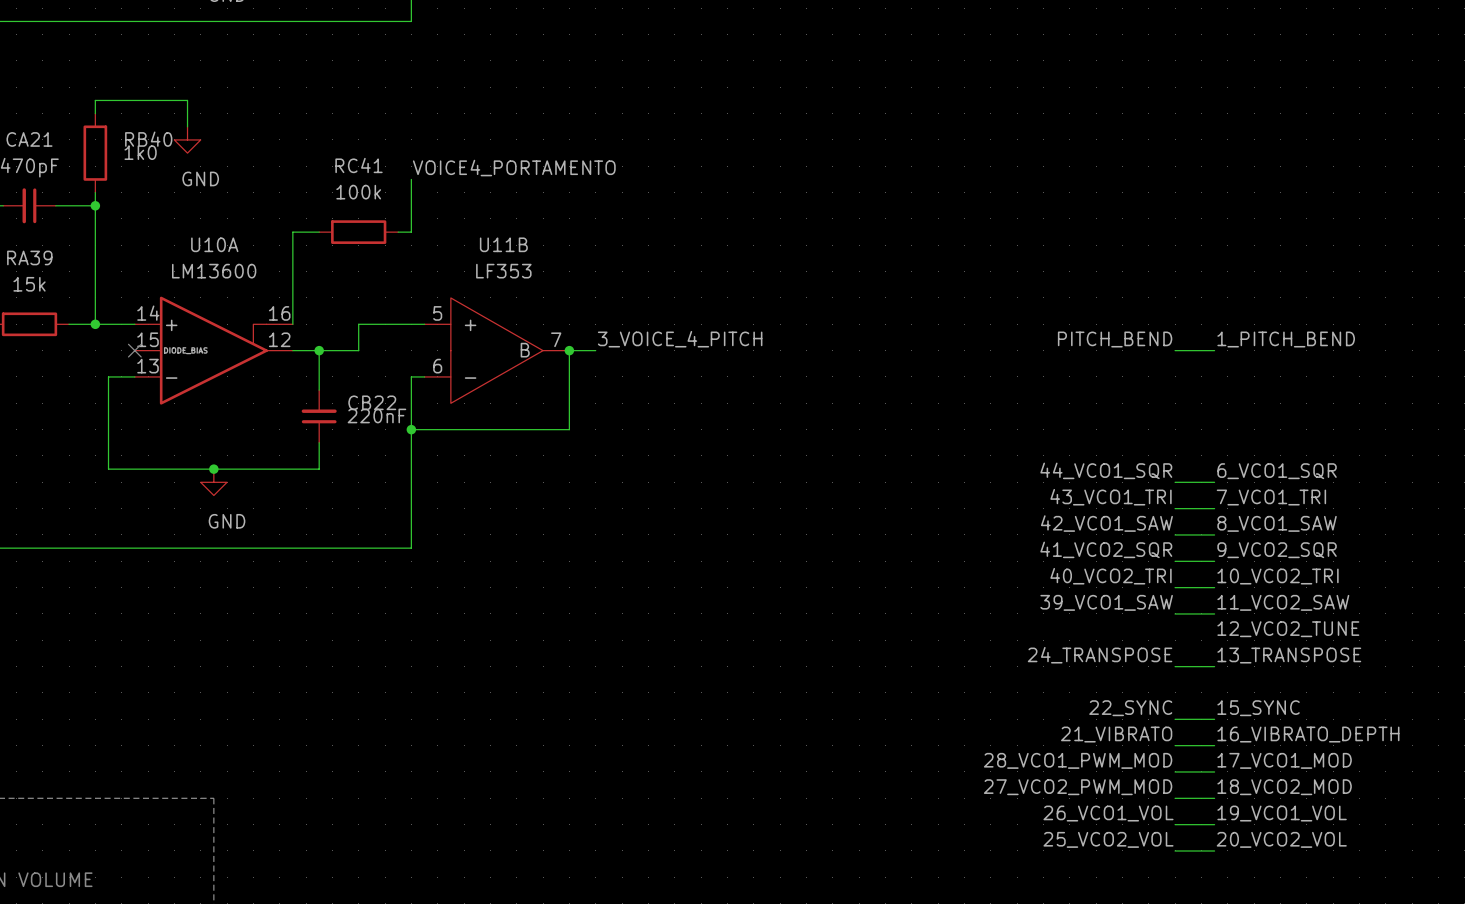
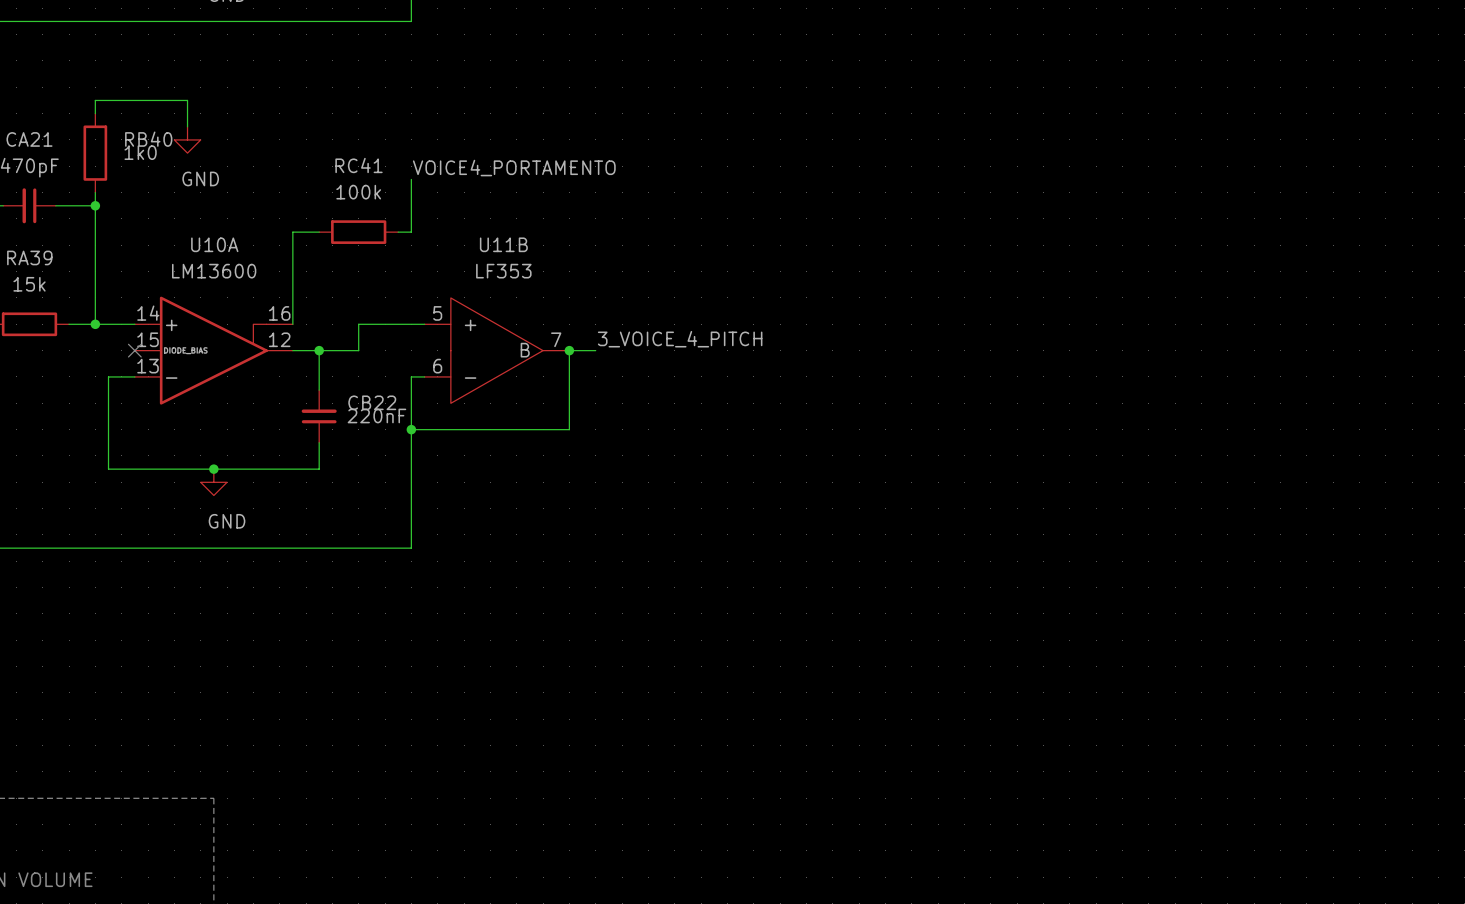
label: PITCH_BEND (1115, 339) -> none
label: 1_PITCH_BEND (1286, 339) -> none
wire: (1175, 350) (1214, 350) -> none
label: 44_VCO1_SQR (1106, 470) -> none
label: 6_VCO1_SQR (1277, 471) -> none
wire: (1175, 482) (1214, 482) -> none
label: 43_VCO1_TRI (1111, 497) -> none
label: 7_VCO1_TRI (1271, 497) -> none
wire: (1175, 508) (1214, 508) -> none
label: 42_VCO1_SAW (1106, 523) -> none
label: 8_VCO1_SAW (1277, 523) -> none
wire: (1175, 534) (1214, 534) -> none
label: 41_VCO2_SQR (1106, 549) -> none
label: 9_VCO2_SQR (1277, 550) -> none
wire: (1175, 561) (1214, 561) -> none
label: 40_VCO2_TRI (1111, 576) -> none
label: 10_VCO2_TRI (1278, 576) -> none
wire: (1175, 587) (1214, 587) -> none
label: 39_VCO1_SAW (1106, 602) -> none
label: 11_VCO2_SAW (1283, 602) -> none
wire: (1175, 613) (1214, 613) -> none
label: 12_VCO2_TUNE (1288, 629) -> none
label: 24_TRANSPOSE (1100, 655) -> none
label: 13_TRANSPOSE (1289, 655) -> none
wire: (1175, 666) (1214, 666) -> none
label: 22_SYNC (1130, 708) -> none
label: 15_SYNC (1258, 708) -> none
wire: (1175, 719) (1214, 719) -> none
label: 21_VIBRATO (1116, 734) -> none
label: 16_VIBRATO_DEPTH (1308, 734) -> none
wire: (1175, 745) (1214, 745) -> none
label: 28_VCO1_PWM_MOD (1078, 760) -> none
label: 17_VCO1_MOD (1284, 760) -> none
wire: (1175, 771) (1214, 771) -> none
label: 27_VCO2_PWM_MOD (1078, 787) -> none
label: 18_VCO2_MOD (1284, 787) -> none
wire: (1175, 798) (1214, 798) -> none
label: 26_VCO1_VOL (1108, 813) -> none
label: 19_VCO1_VOL (1282, 813) -> none
wire: (1175, 824) (1214, 824) -> none
label: 25_VCO2_VOL (1108, 839) -> none
label: 20_VCO2_VOL (1281, 839) -> none
wire: (1175, 850) (1214, 850) -> none

